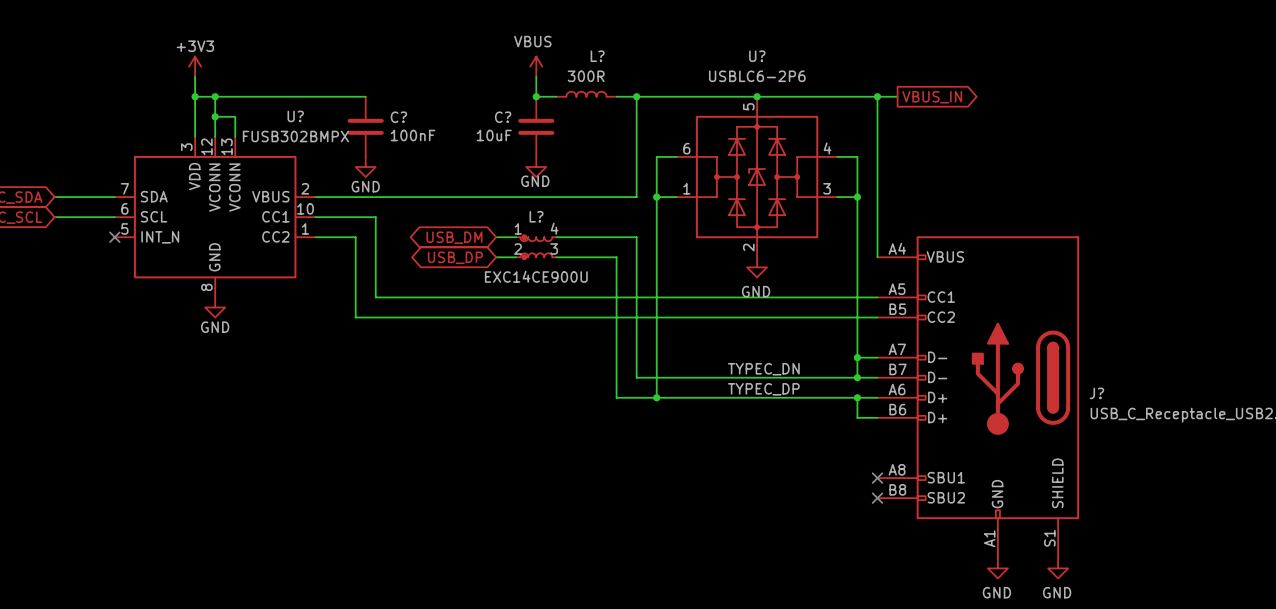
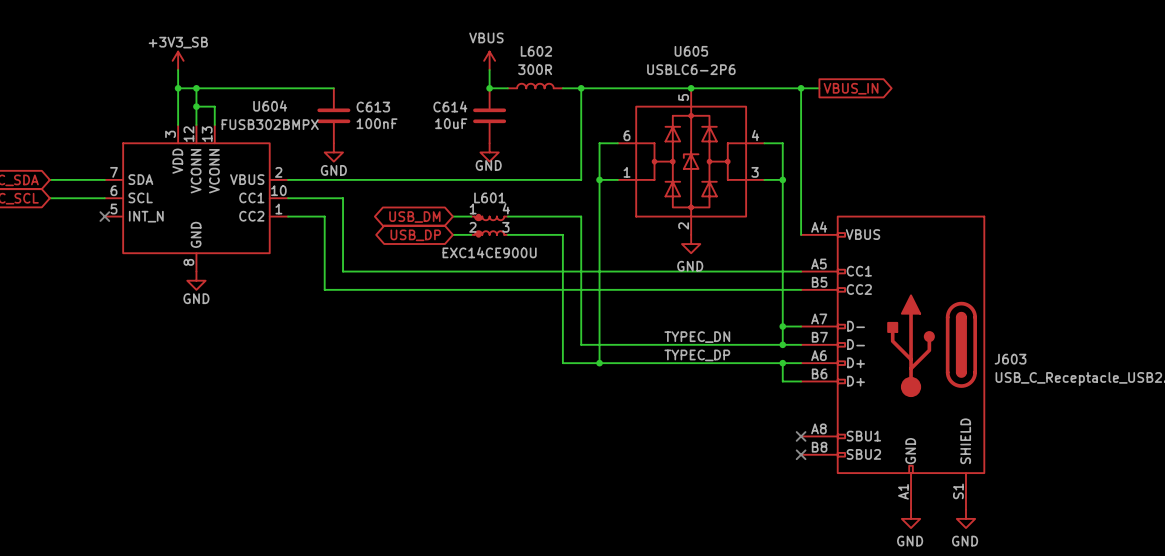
L? name: L? (597, 56) -> L602 (536, 51)
U? name: U? (757, 56) -> U605 (691, 51)
power symbol: +3V3 (195, 66) -> +3V3_SB (178, 60)
U? name: U? (295, 116) -> U604 (270, 106)
C? name: C? (398, 117) -> C613 (373, 107)
C? name: C? (503, 117) -> C614 (450, 106)
L? name: L? (536, 216) -> L601 (489, 197)
J? name: J? (1096, 393) -> J603 (1010, 359)

